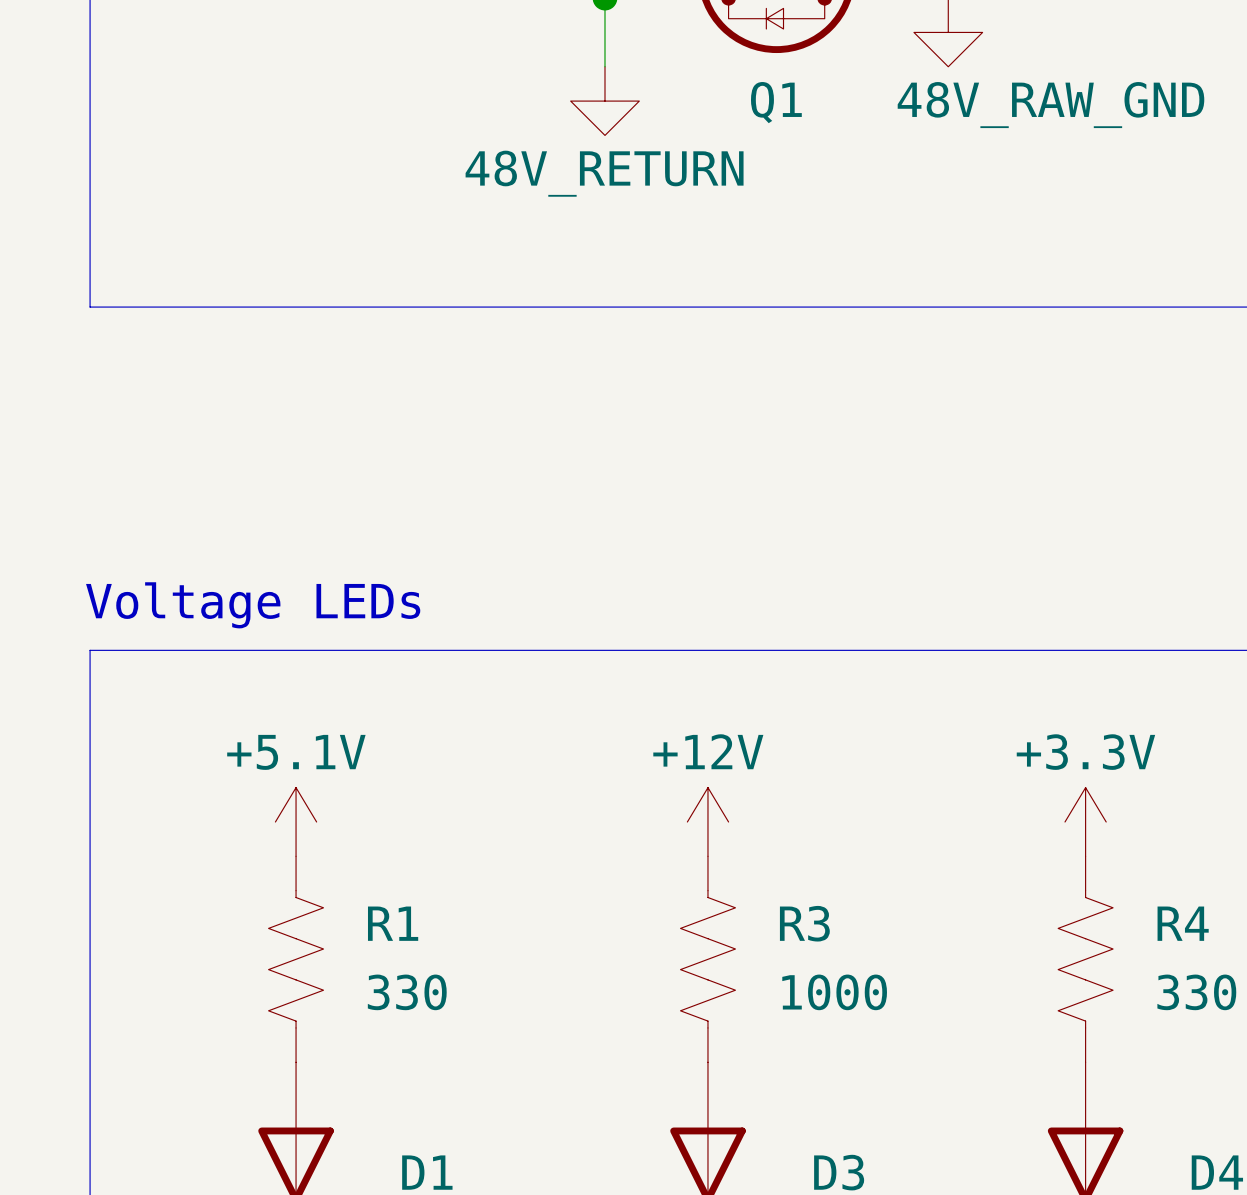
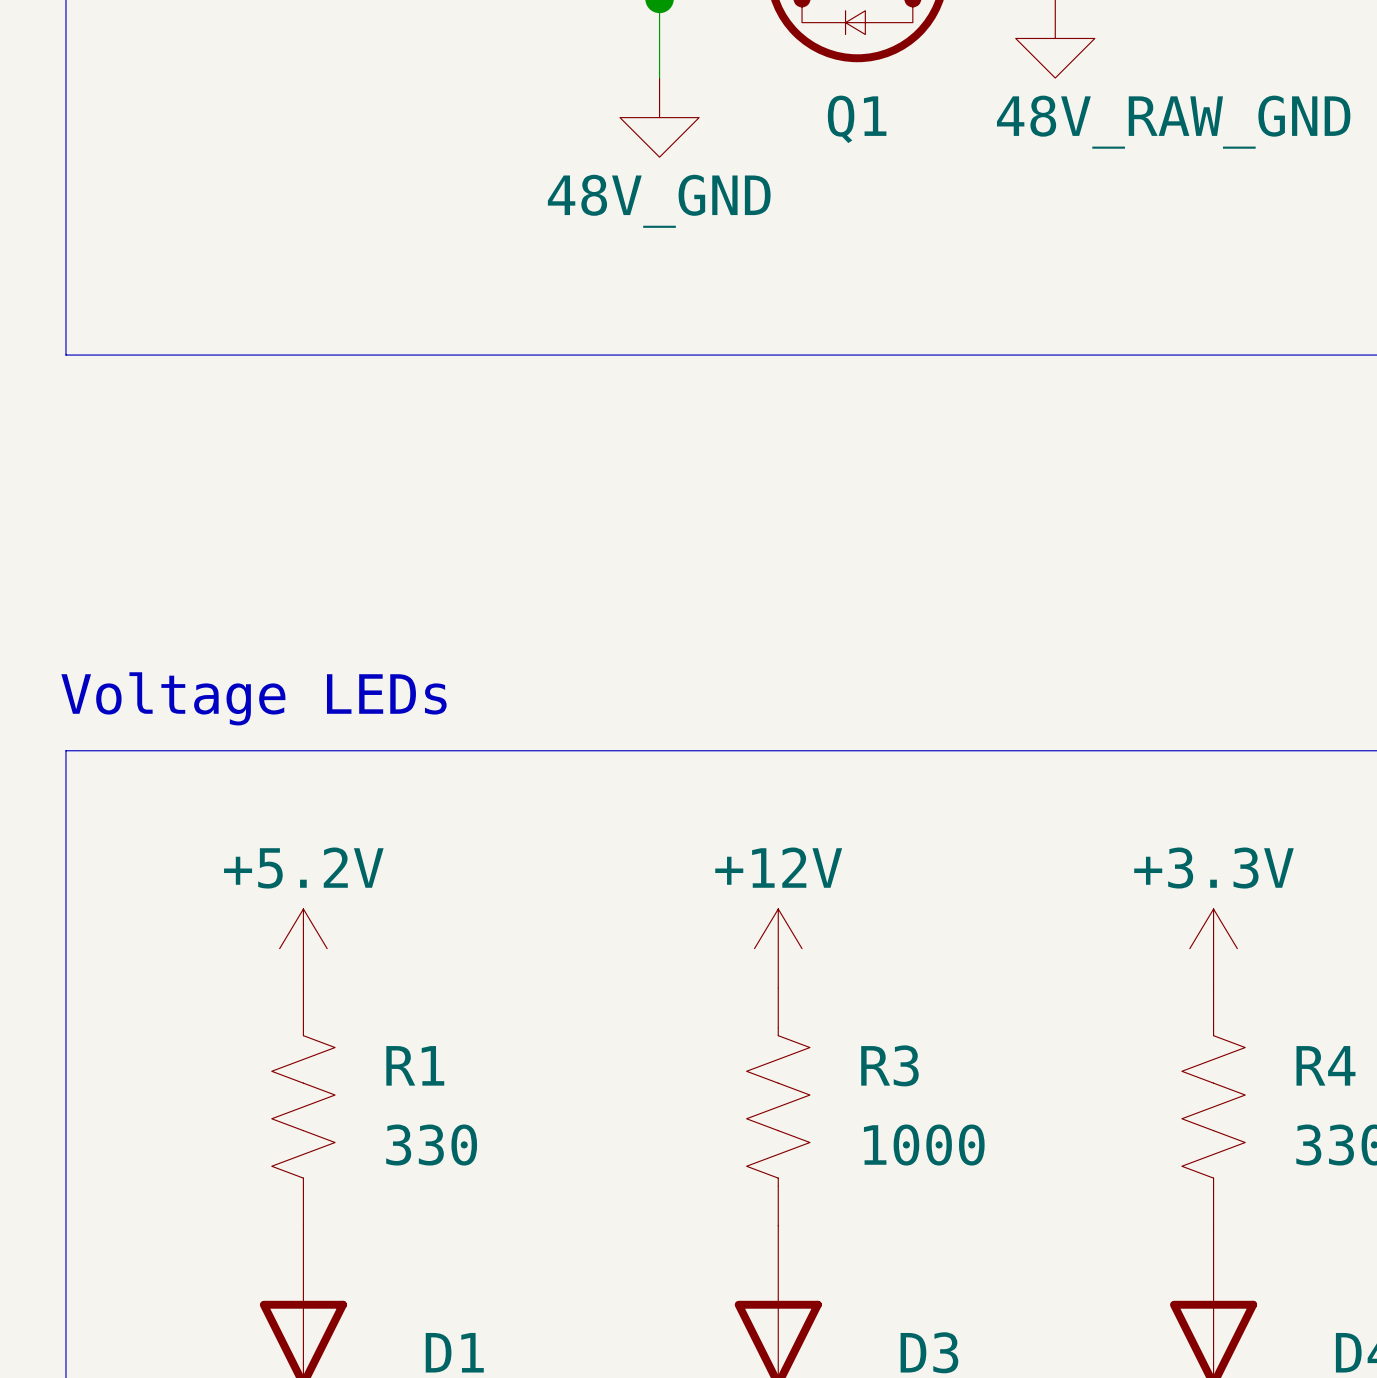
power symbol: 48V_RETURN (604, 101) -> 48V_GND (659, 117)
power symbol: +5.1V (296, 821) -> +5.2V (303, 948)

